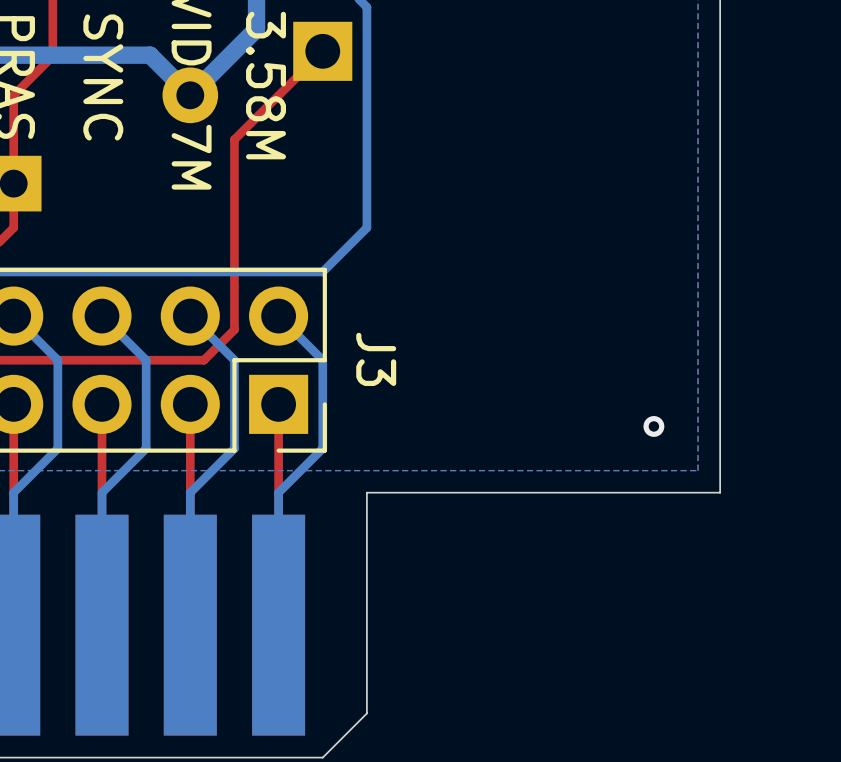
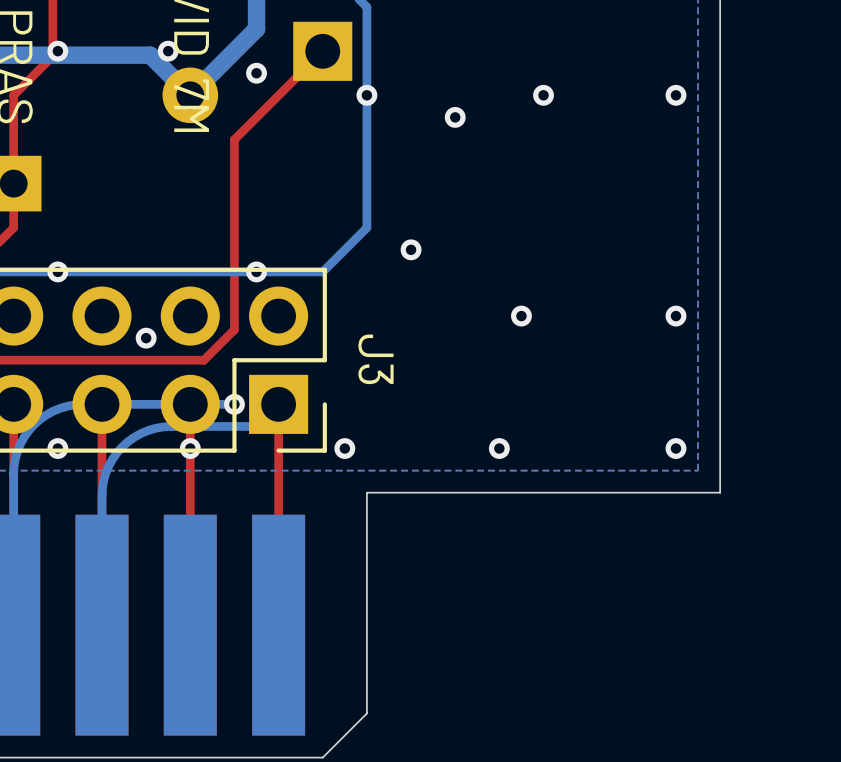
via: none -> (57, 51)
via: none -> (168, 51)
via: none -> (256, 73)
text: SYNC (103, 77) -> none
text: 3.58M (266, 85) -> none
via: none -> (366, 95)
via: none -> (543, 95)
via: none -> (675, 95)
via: none -> (455, 117)
via: none -> (411, 249)
via: none -> (57, 271)
via: none -> (256, 271)
bottom track: (13, 316) (57, 360) (57, 448) (13, 492) -> (234, 404) (83, 404) (60, 408) (46, 415) (34, 424) (20, 443) (14, 466) (13, 492)
bottom track: (102, 316) (146, 360) (146, 448) (102, 492) (102, 495) -> (278, 426) (171, 426) (148, 430) (128, 441) (112, 458) (105, 473) (102, 495)
bottom track: (190, 316) (234, 360) (234, 448) (190, 492) (190, 625) -> none
bottom track: (278, 316) (322, 360) (322, 448) (278, 492) (278, 625) -> none
via: none -> (521, 316)
via: none -> (675, 316)
via: none -> (146, 338)
via: none -> (234, 404)
via position: (653, 426) -> (675, 448)
via: none -> (57, 448)
via: none -> (190, 448)
via: none -> (344, 448)
via: none -> (499, 448)

